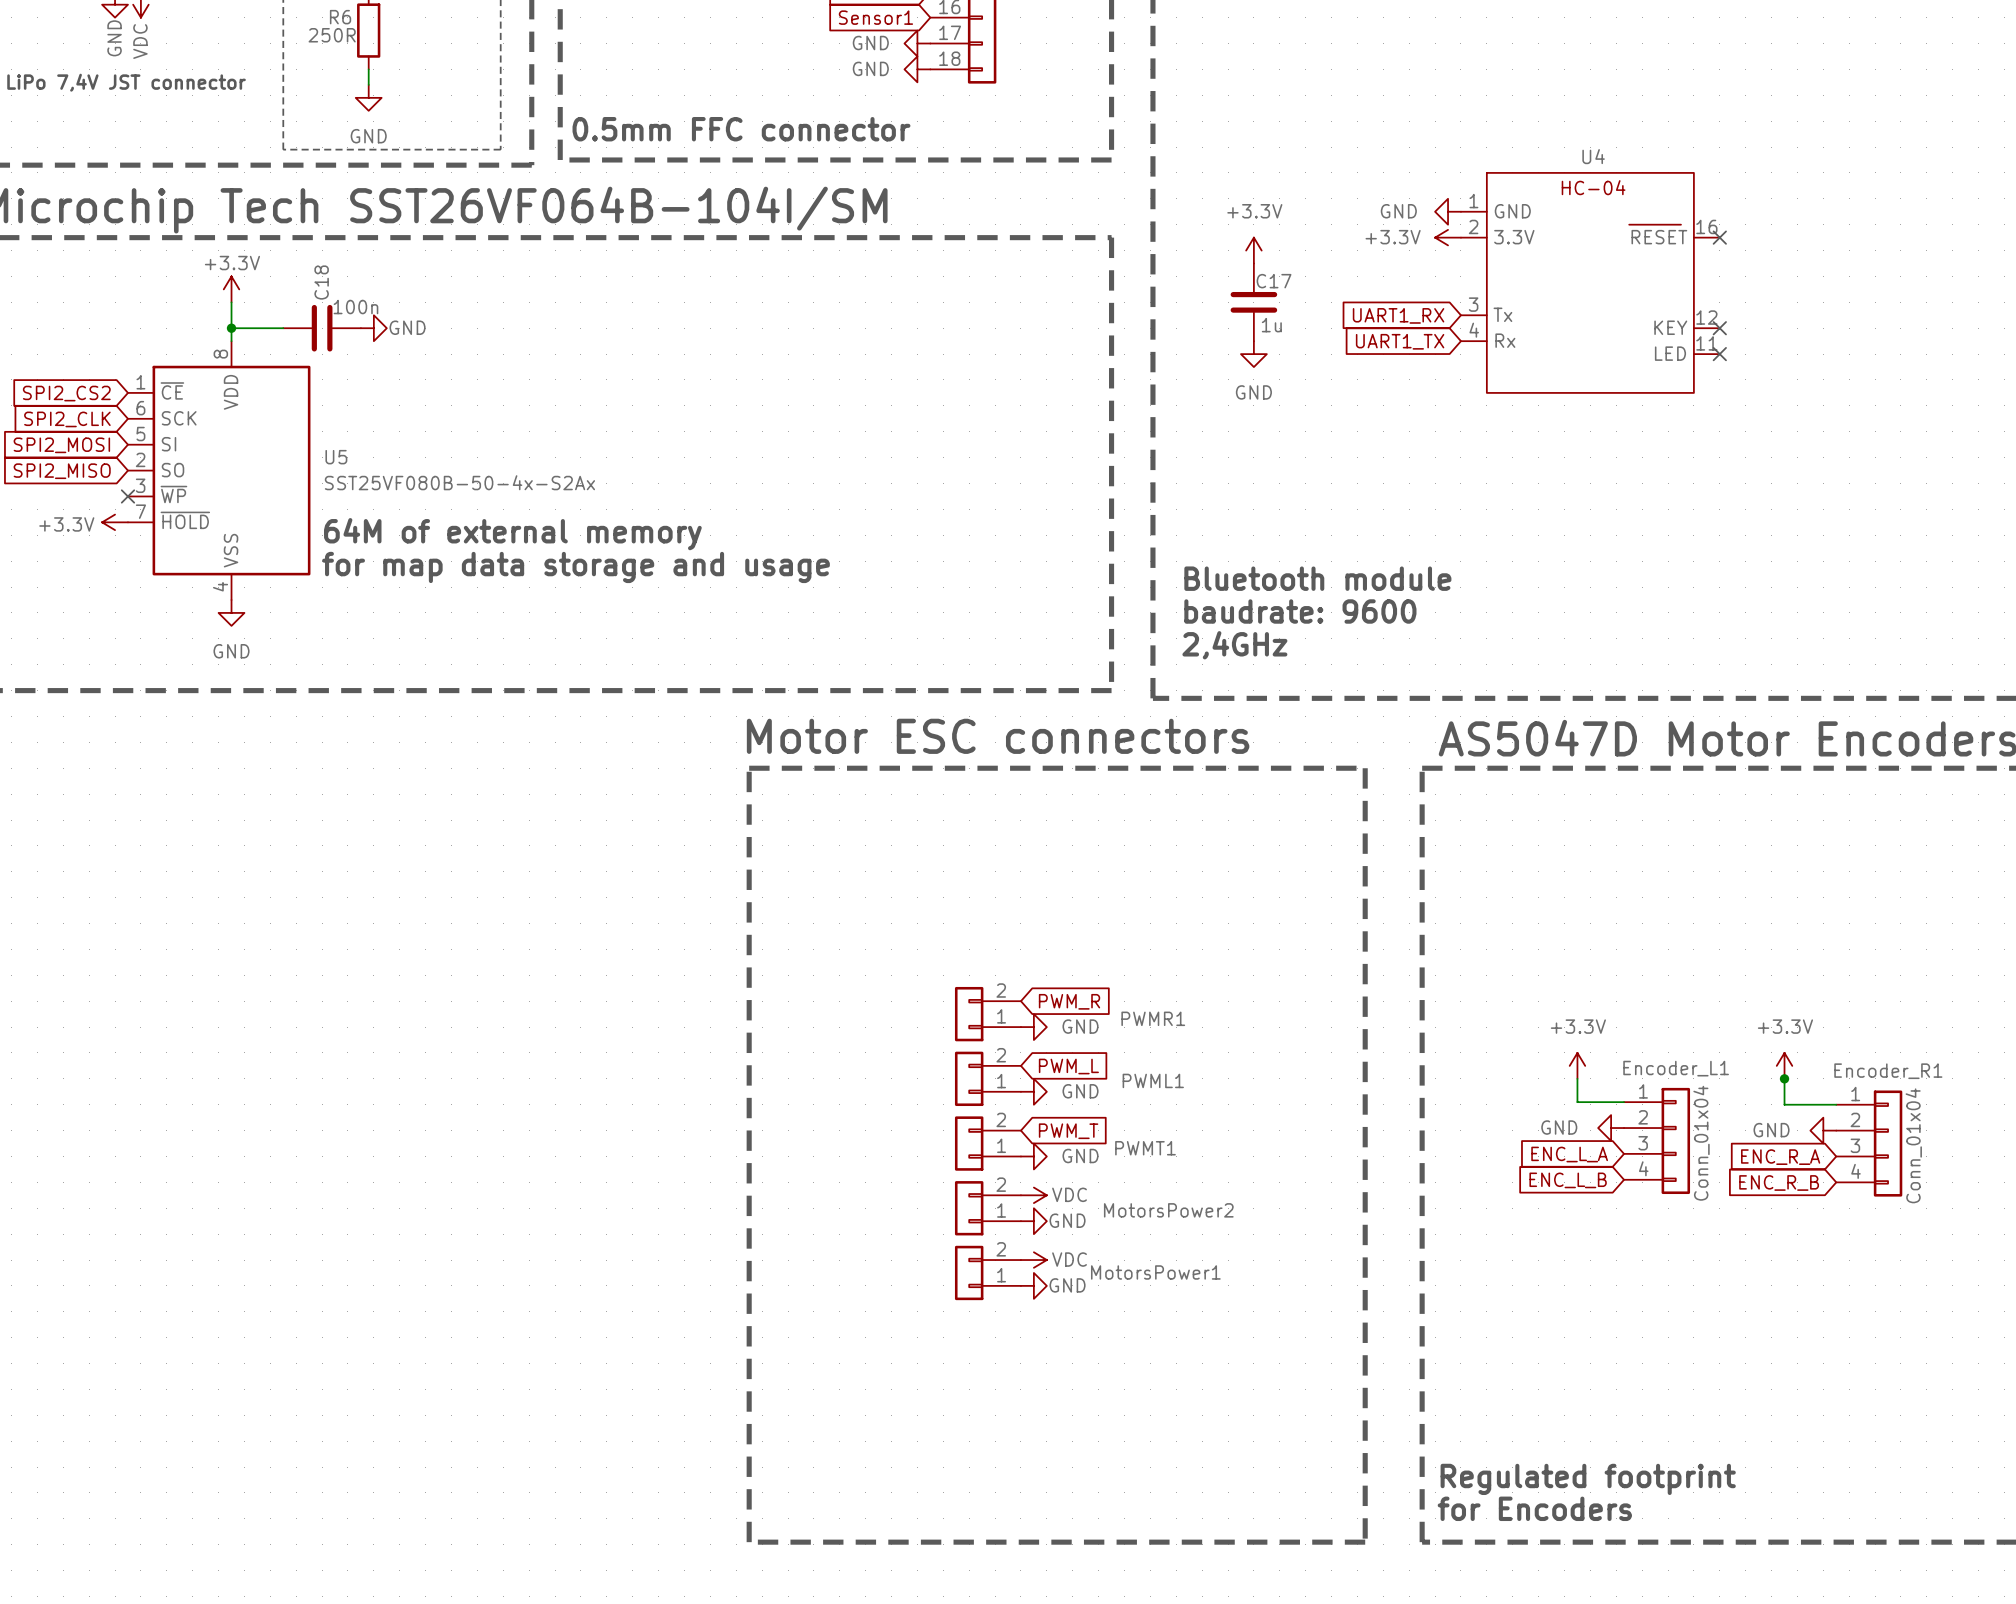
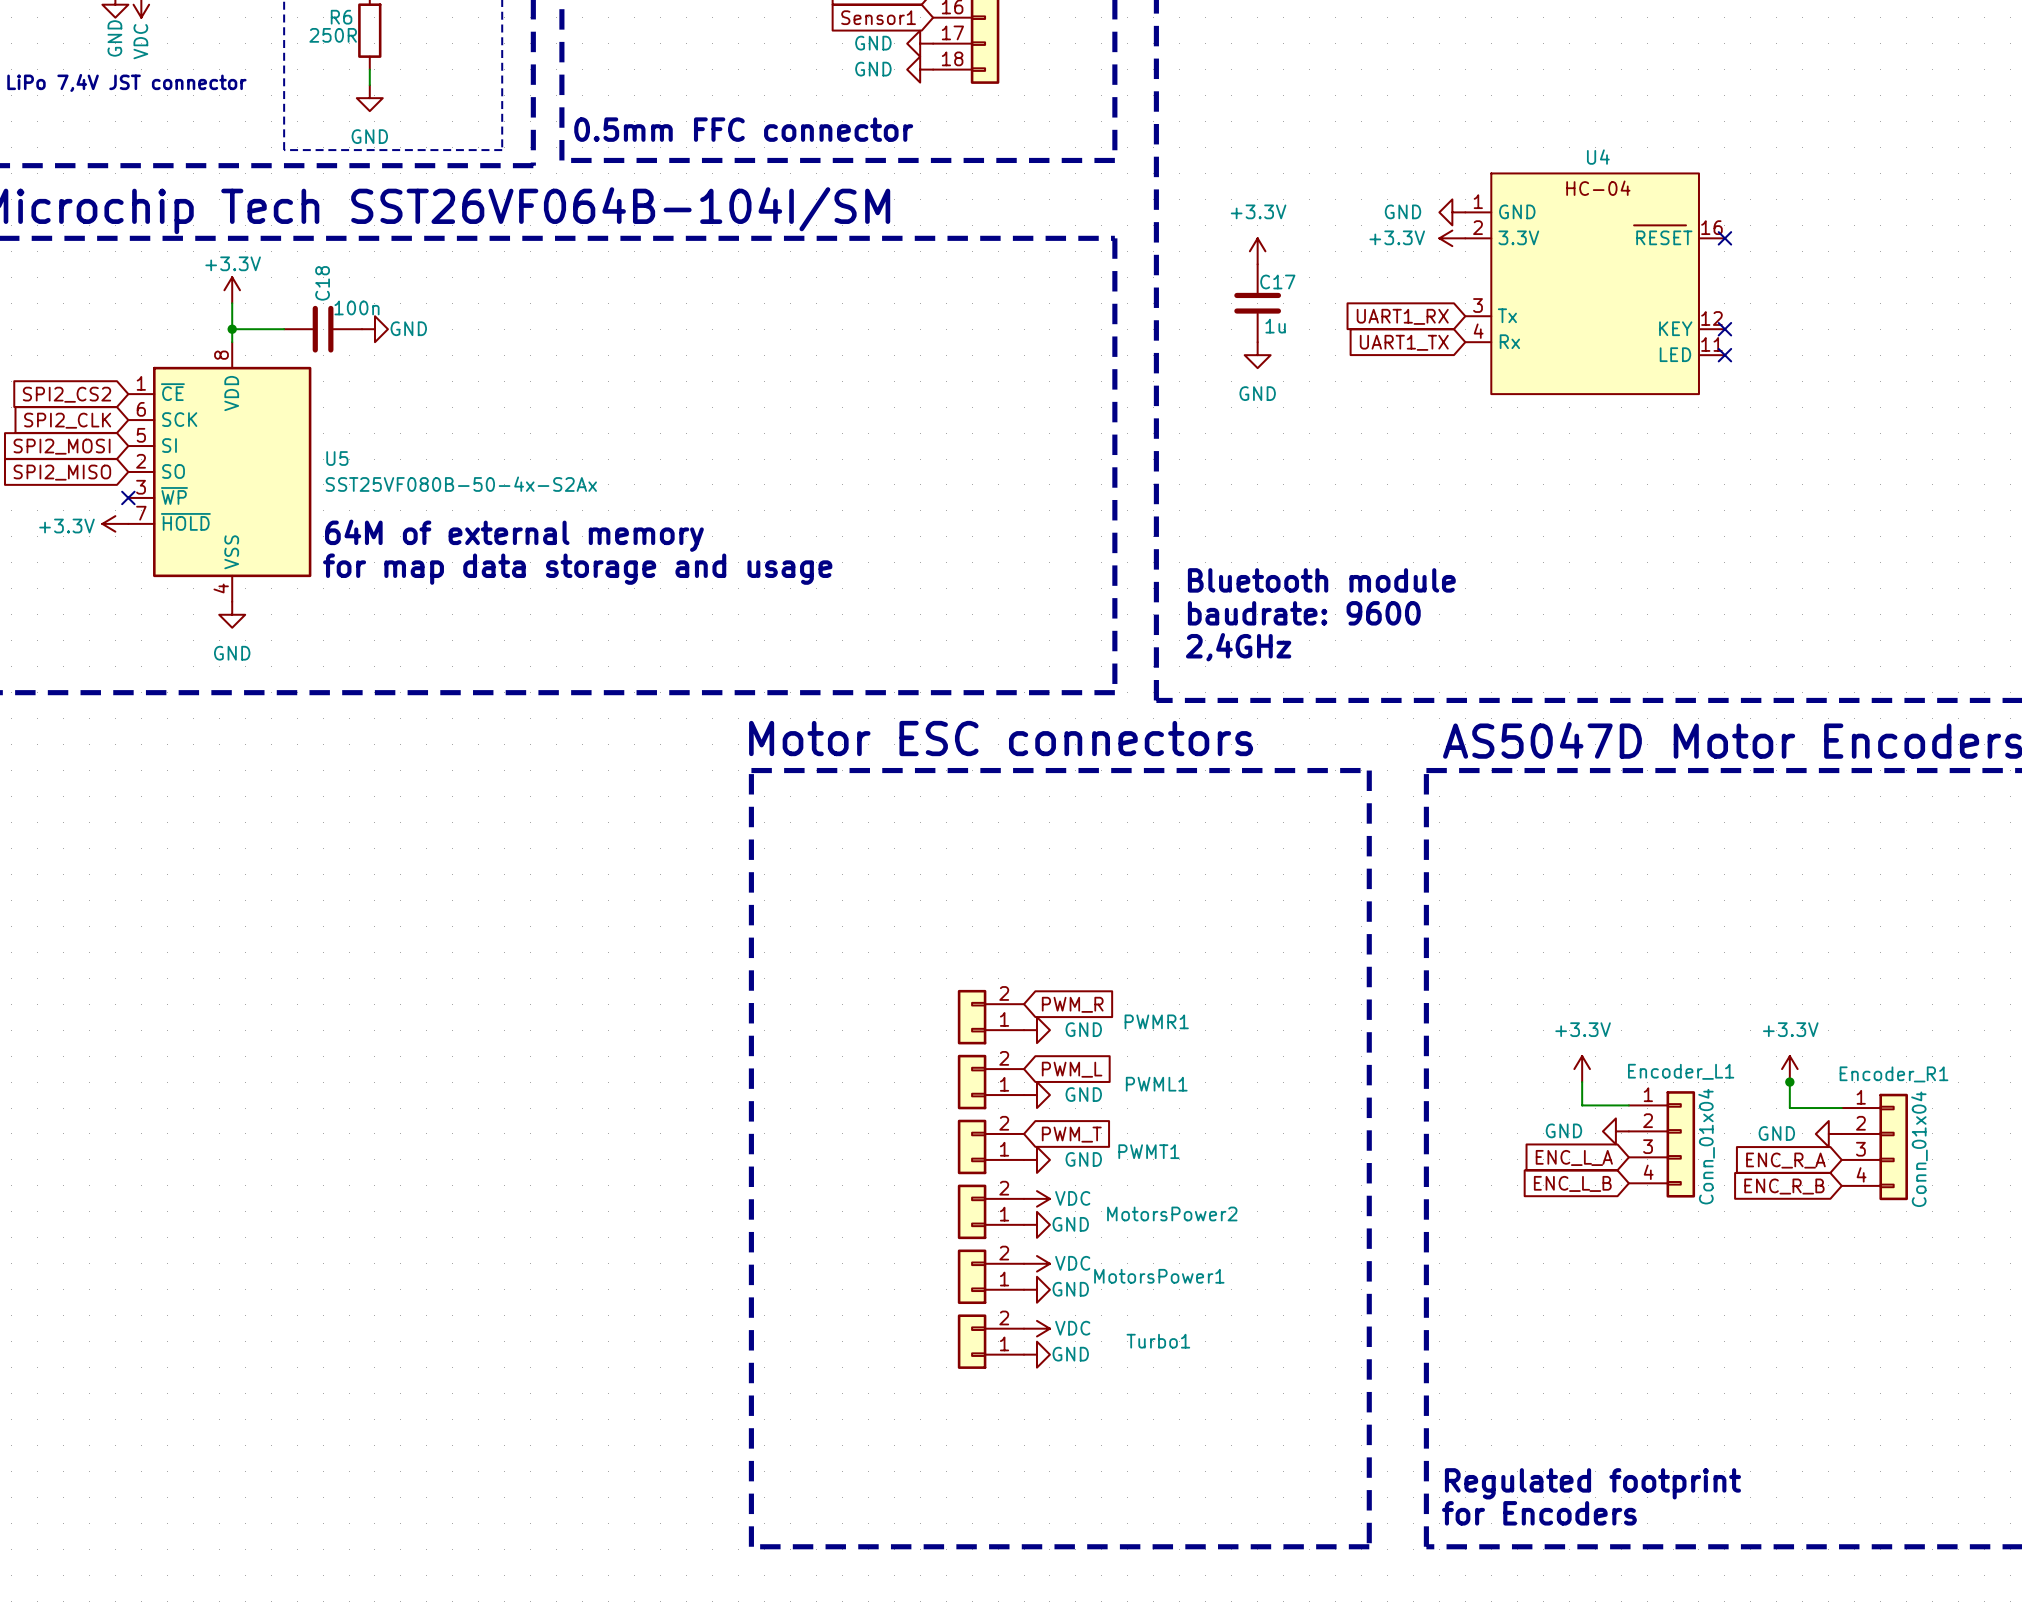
power symbol: none -> VDC (1036, 1328)
Turbo1: none -> (990, 1341)
power symbol: none -> GND (1036, 1354)

